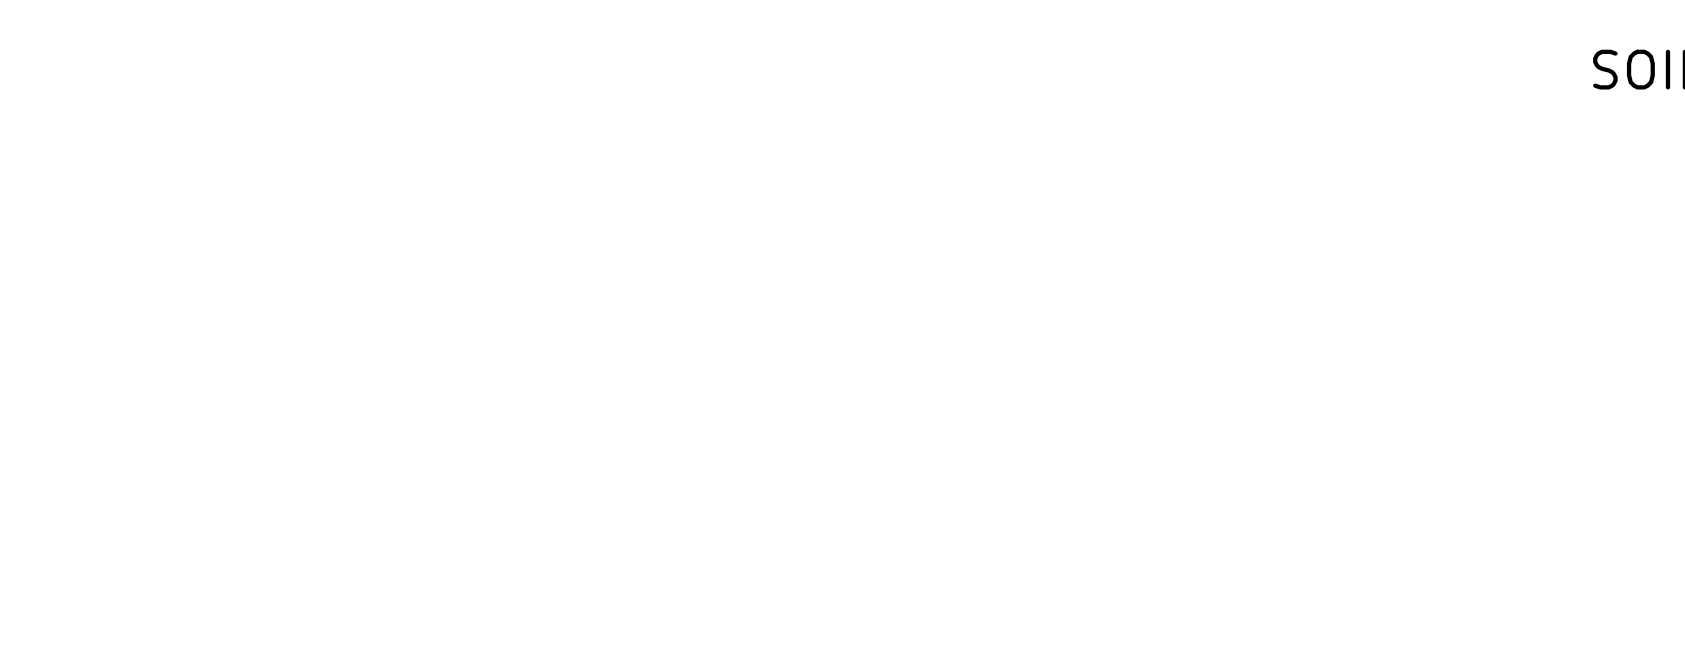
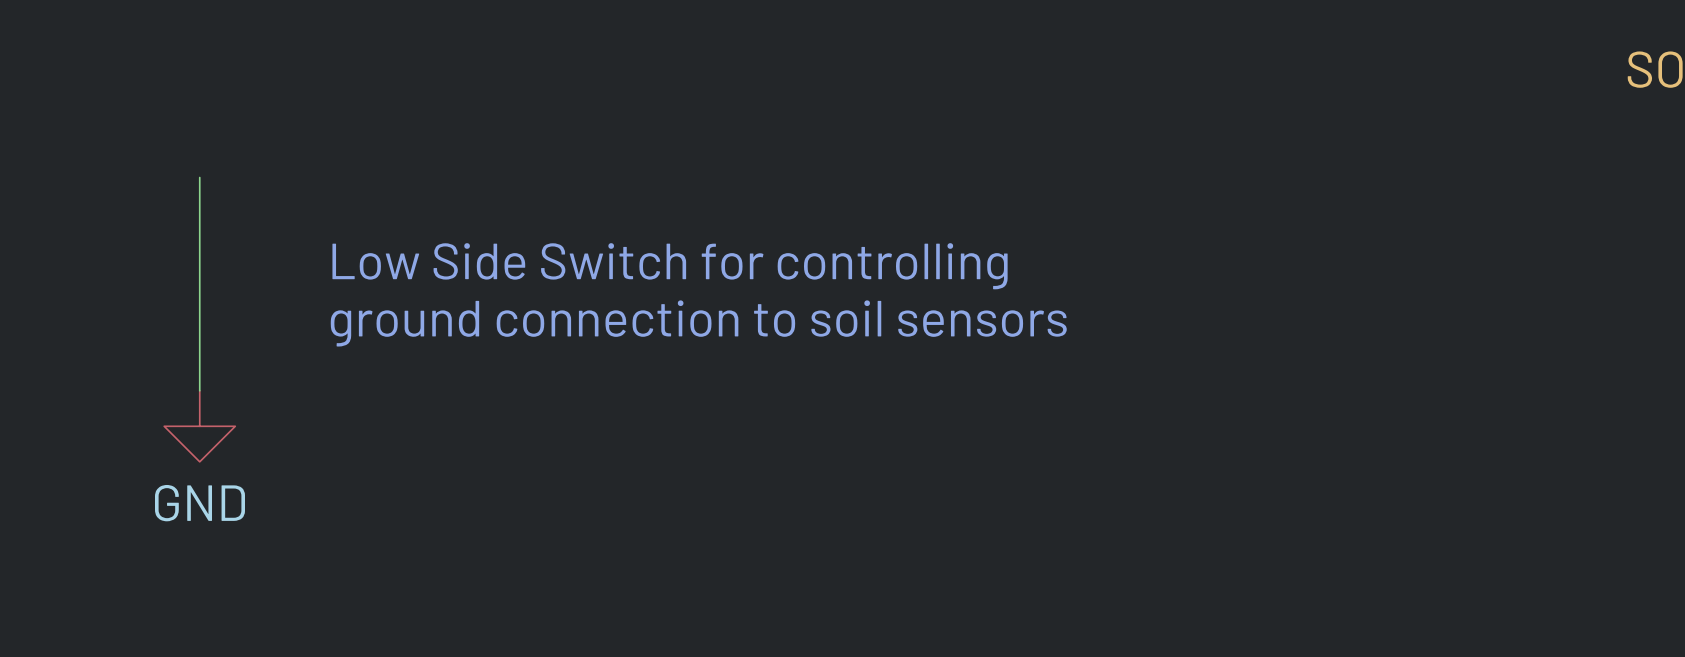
wire: none -> (199, 177) (199, 390)
text: none -> Low Side Switch for controlling (670, 266)
text: none -> ground connection to soil sensors (698, 323)
power symbol: none -> GND (199, 426)

